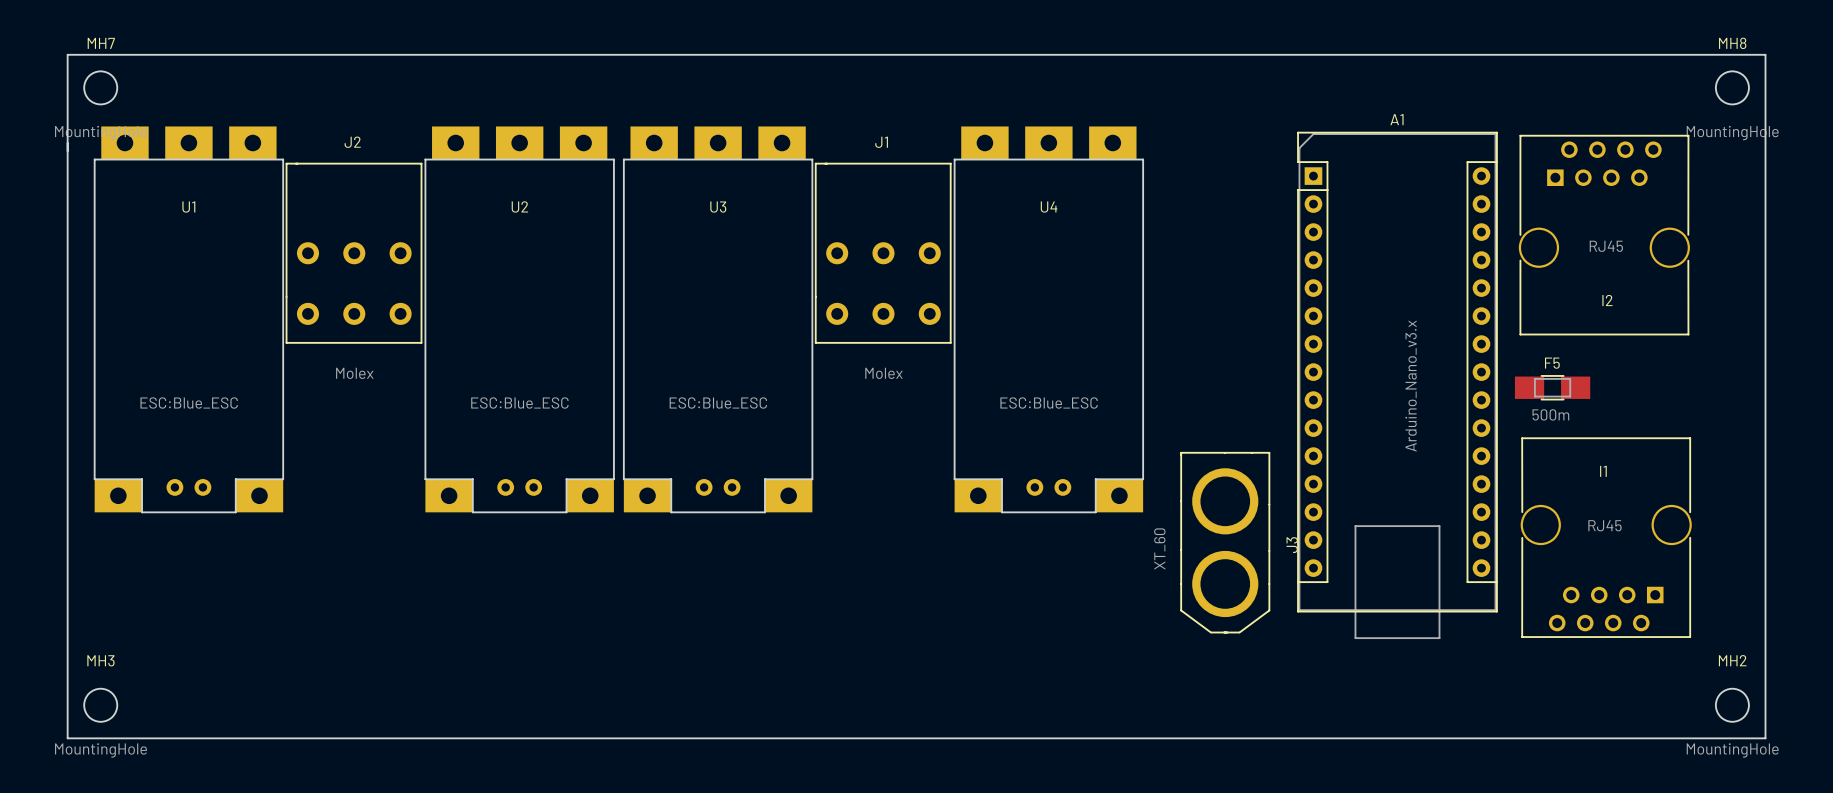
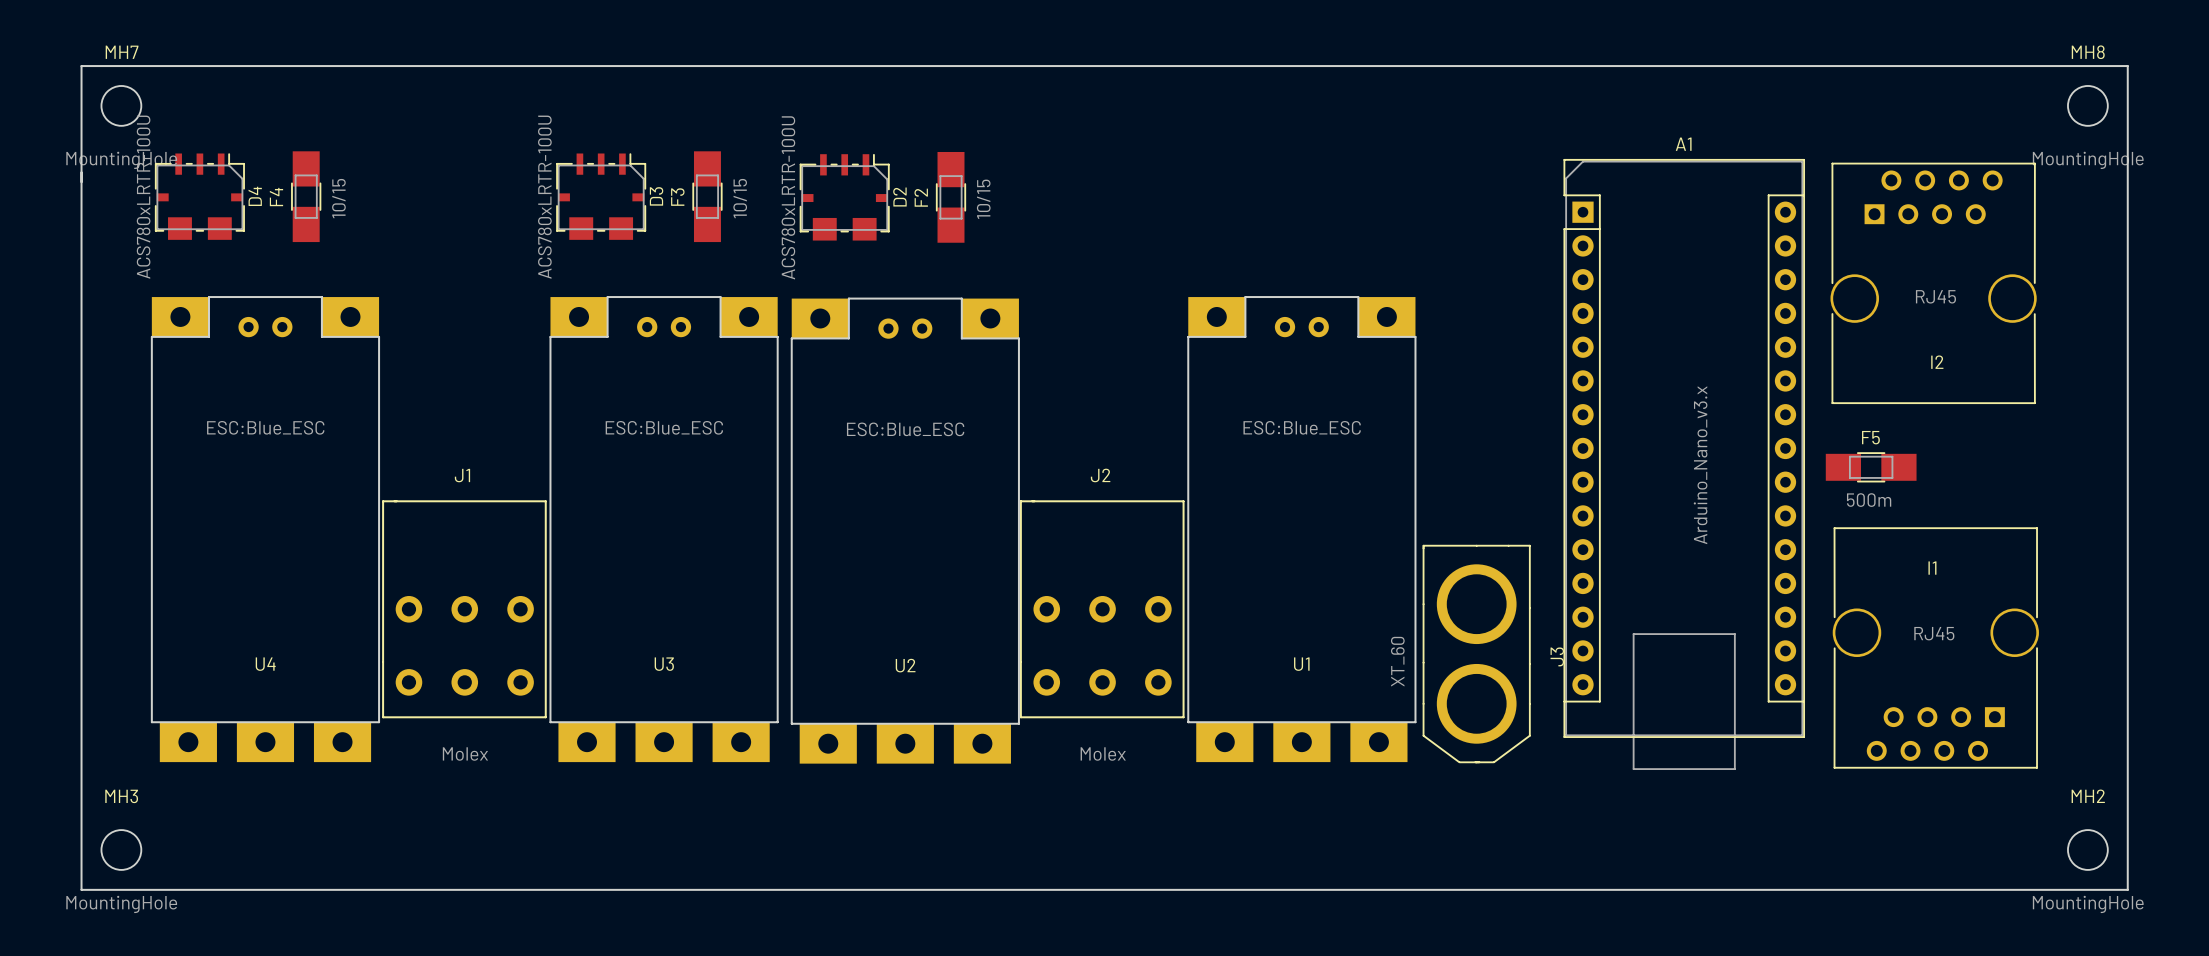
D4: none -> ACS780xLRTR-100U (199, 196)
F4: none -> 10/15 (306, 196)
D3: none -> ACS780xLRTR-100U (601, 196)
F3: none -> 10/15 (707, 196)
D2: none -> ACS780xLRTR-100U (844, 197)
F2: none -> 10/15 (951, 197)
J2 position: (354, 253) -> (1102, 609)
J1 position: (883, 253) -> (464, 609)
U1 rotation: 0° (188, 319) -> 180° (1301, 529)
U1 position: (188, 319) -> (1301, 529)
U2 rotation: 0° (519, 319) -> 180° (905, 530)
U2 position: (519, 319) -> (905, 530)
U3 rotation: 0° (718, 319) -> 180° (664, 529)
U4 rotation: 0° (1048, 319) -> 180° (265, 529)
U4 position: (1048, 319) -> (265, 529)

